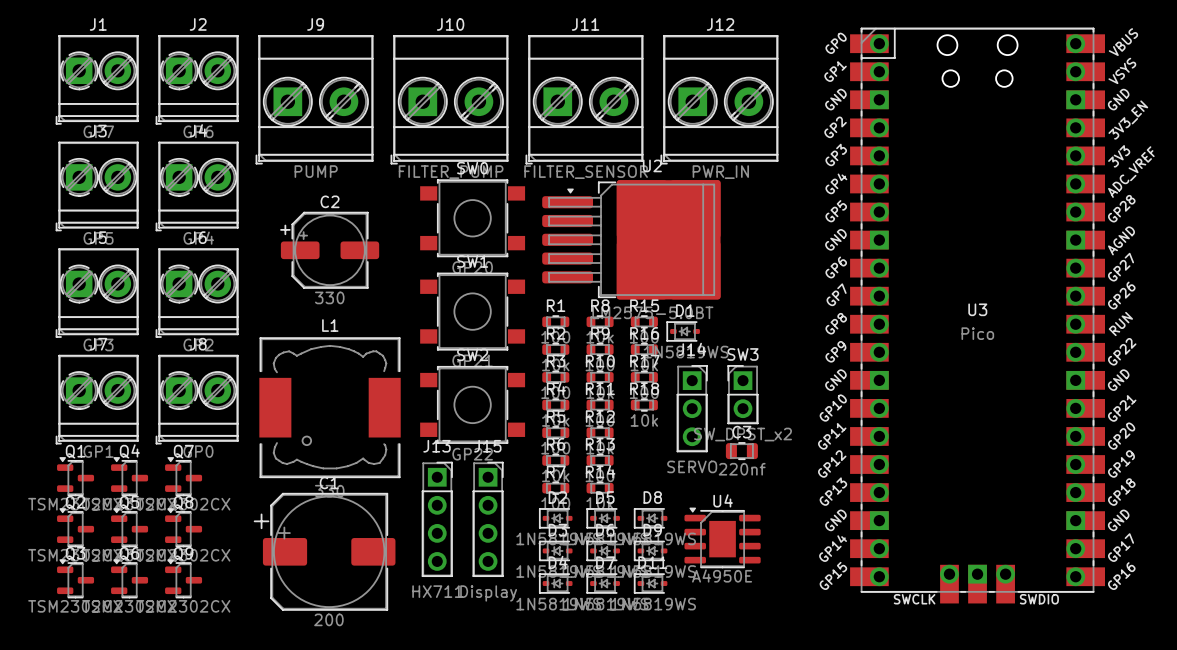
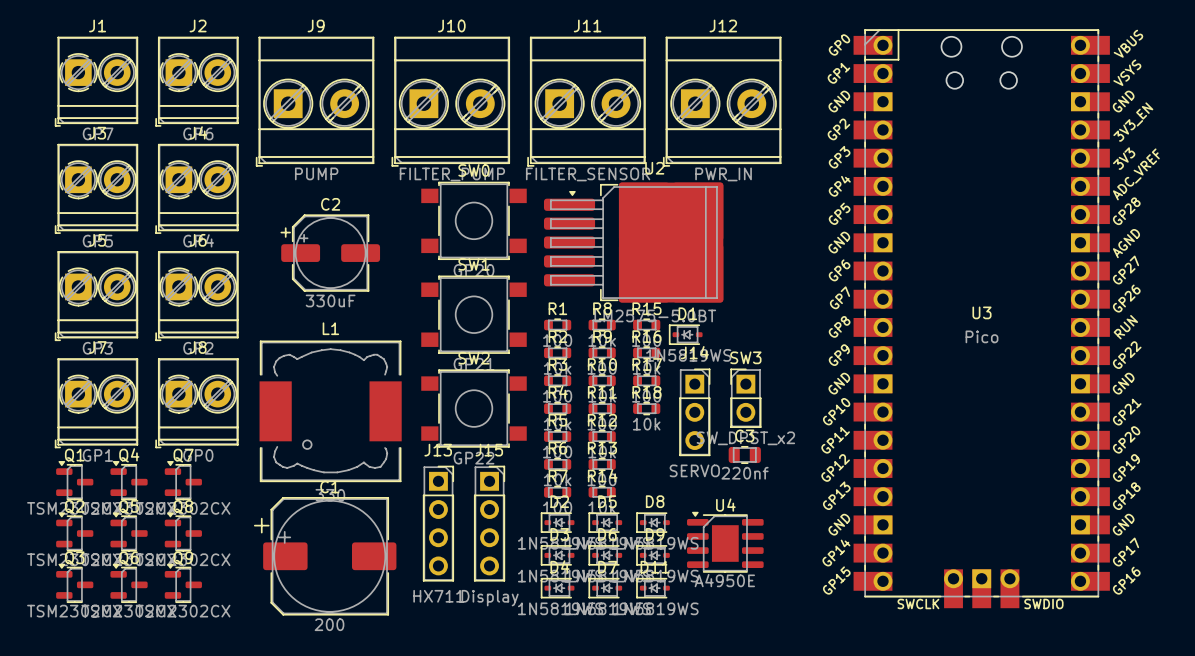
C2 value: 330 (329, 297) -> 330uF (330, 300)

